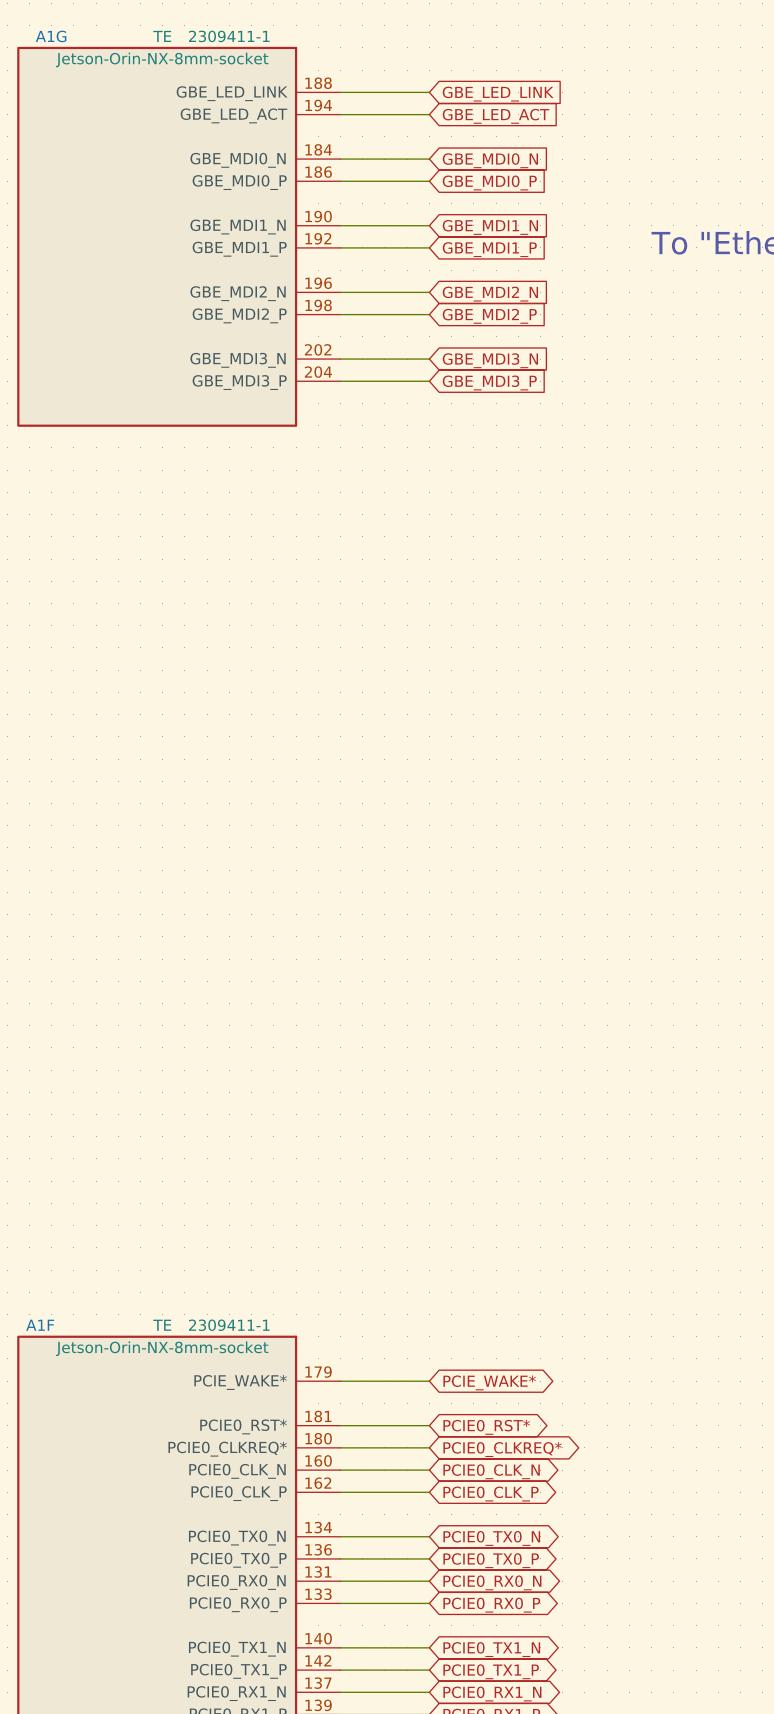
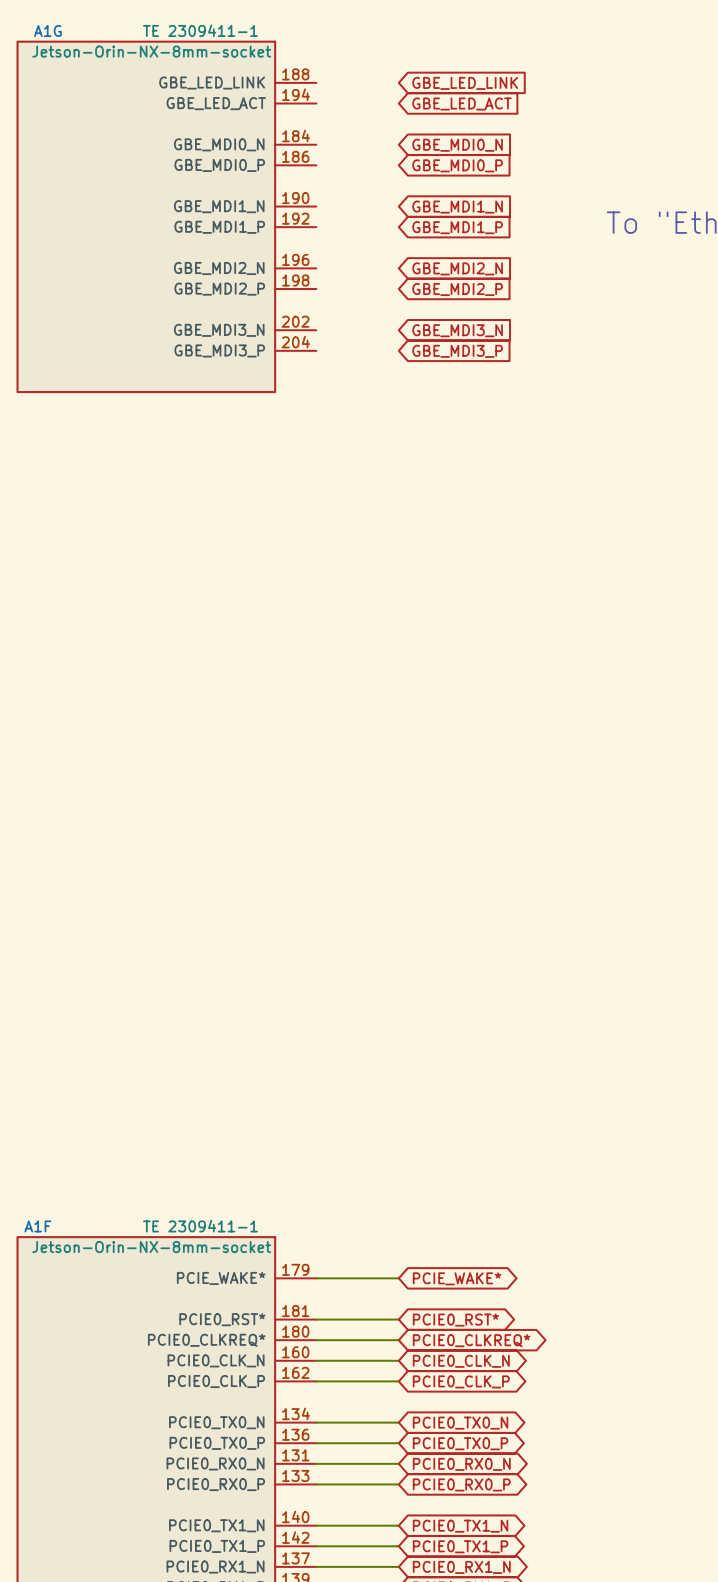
wire: (340, 92) (429, 92) -> none
wire: (340, 114) (429, 114) -> none
wire: (340, 159) (429, 159) -> none
wire: (340, 181) (429, 181) -> none
wire: (340, 225) (429, 225) -> none
wire: (340, 247) (429, 247) -> none
wire: (340, 292) (429, 292) -> none
wire: (340, 314) (429, 314) -> none
wire: (340, 359) (429, 359) -> none
wire: (340, 381) (429, 381) -> none

